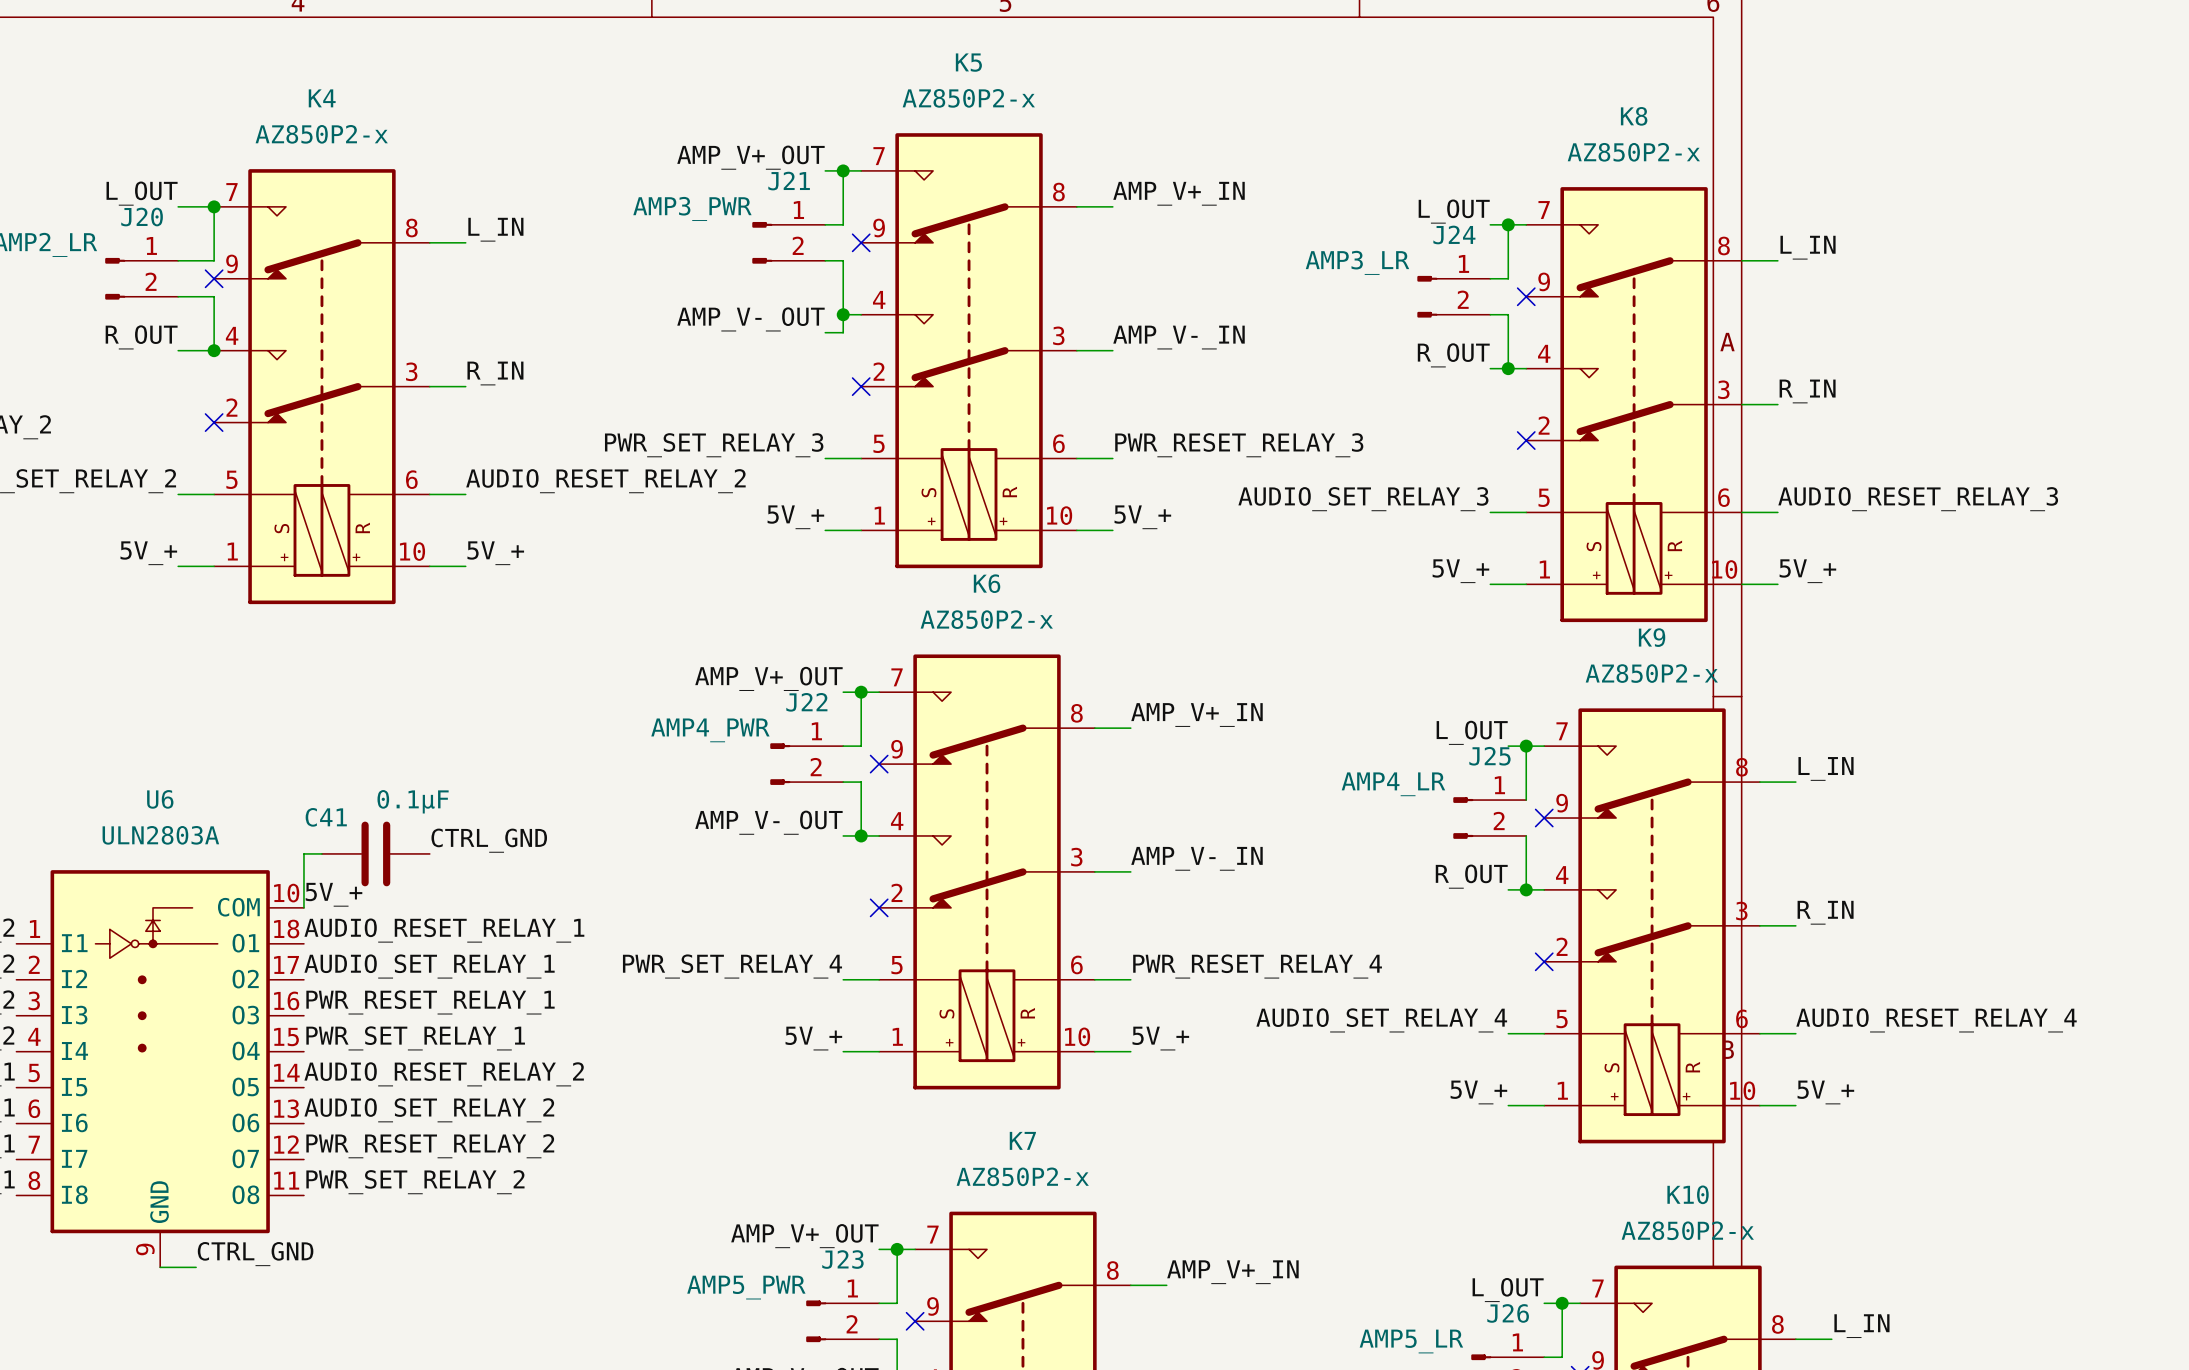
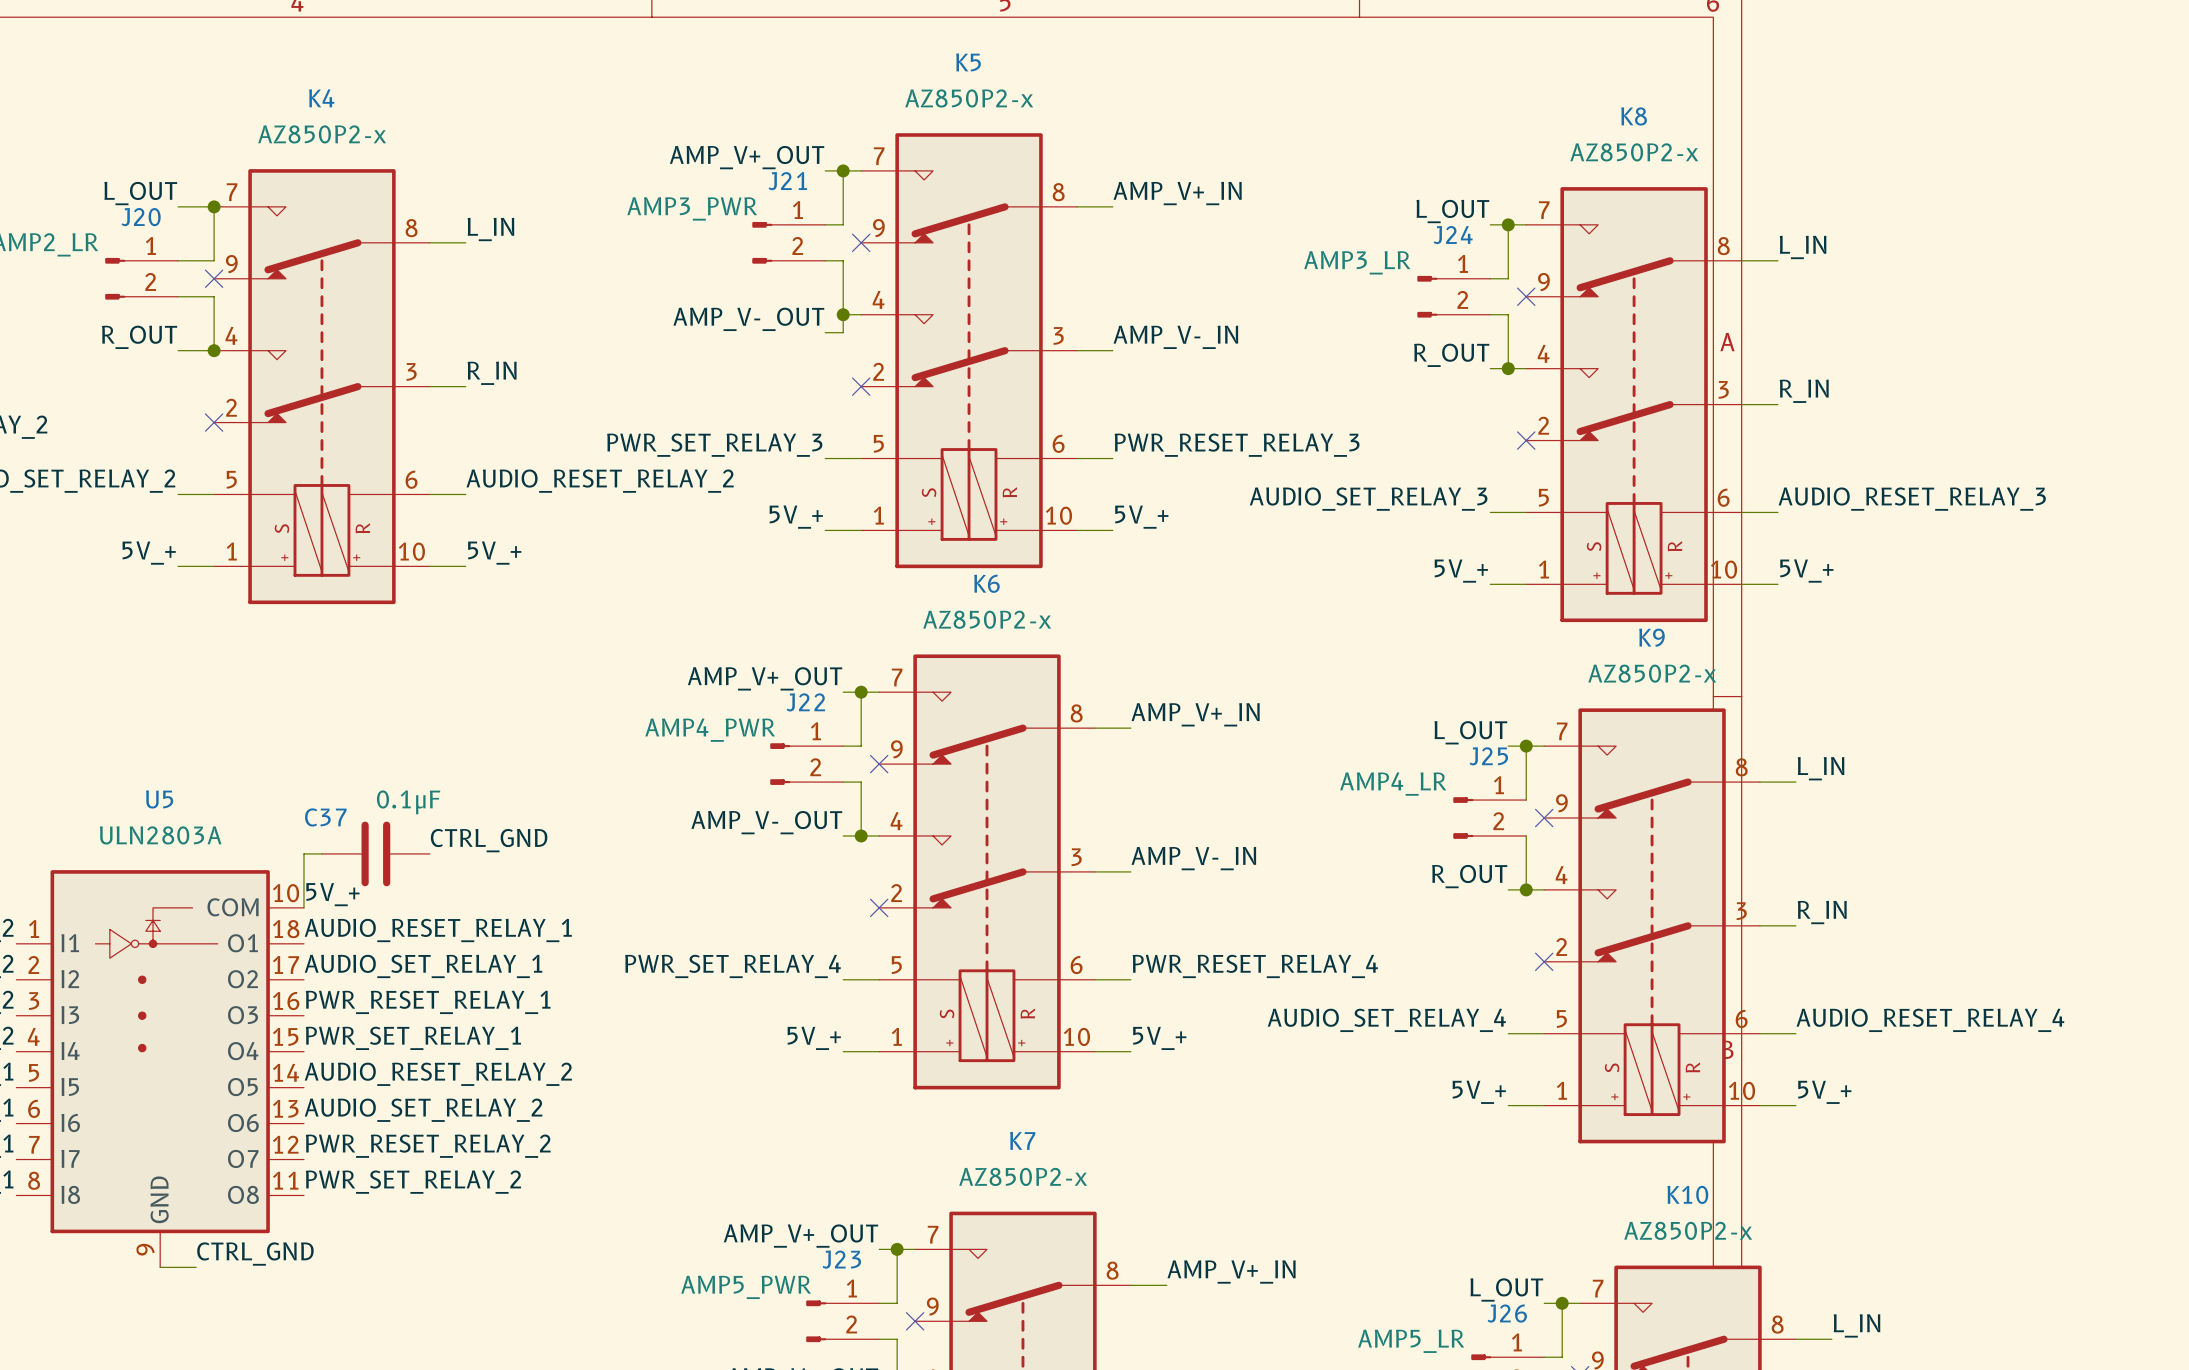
U6 name: U6 (160, 799) -> U5 (159, 799)
C41 name: C41 (326, 817) -> C37 (325, 817)

